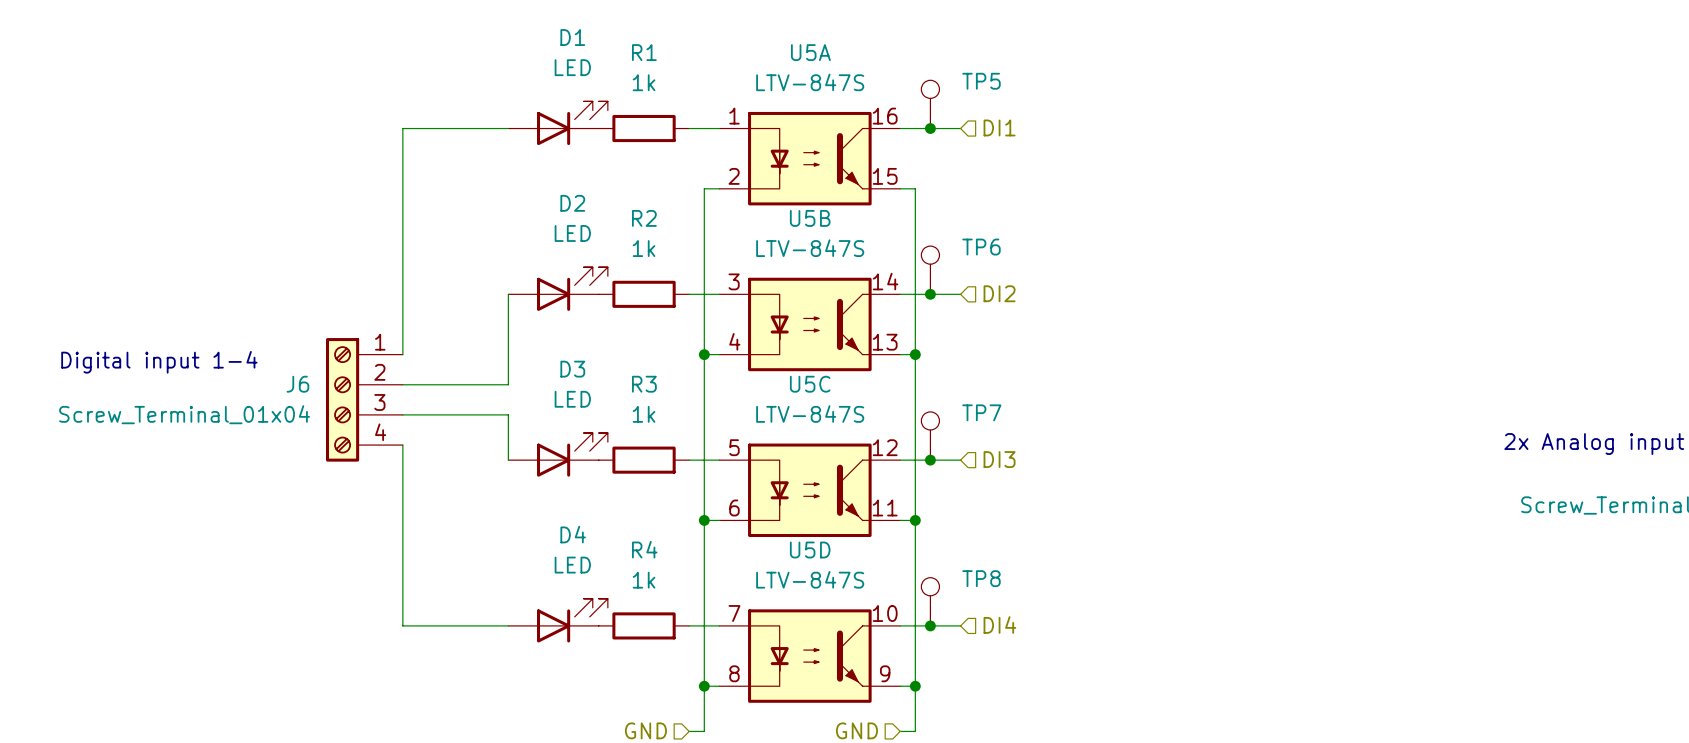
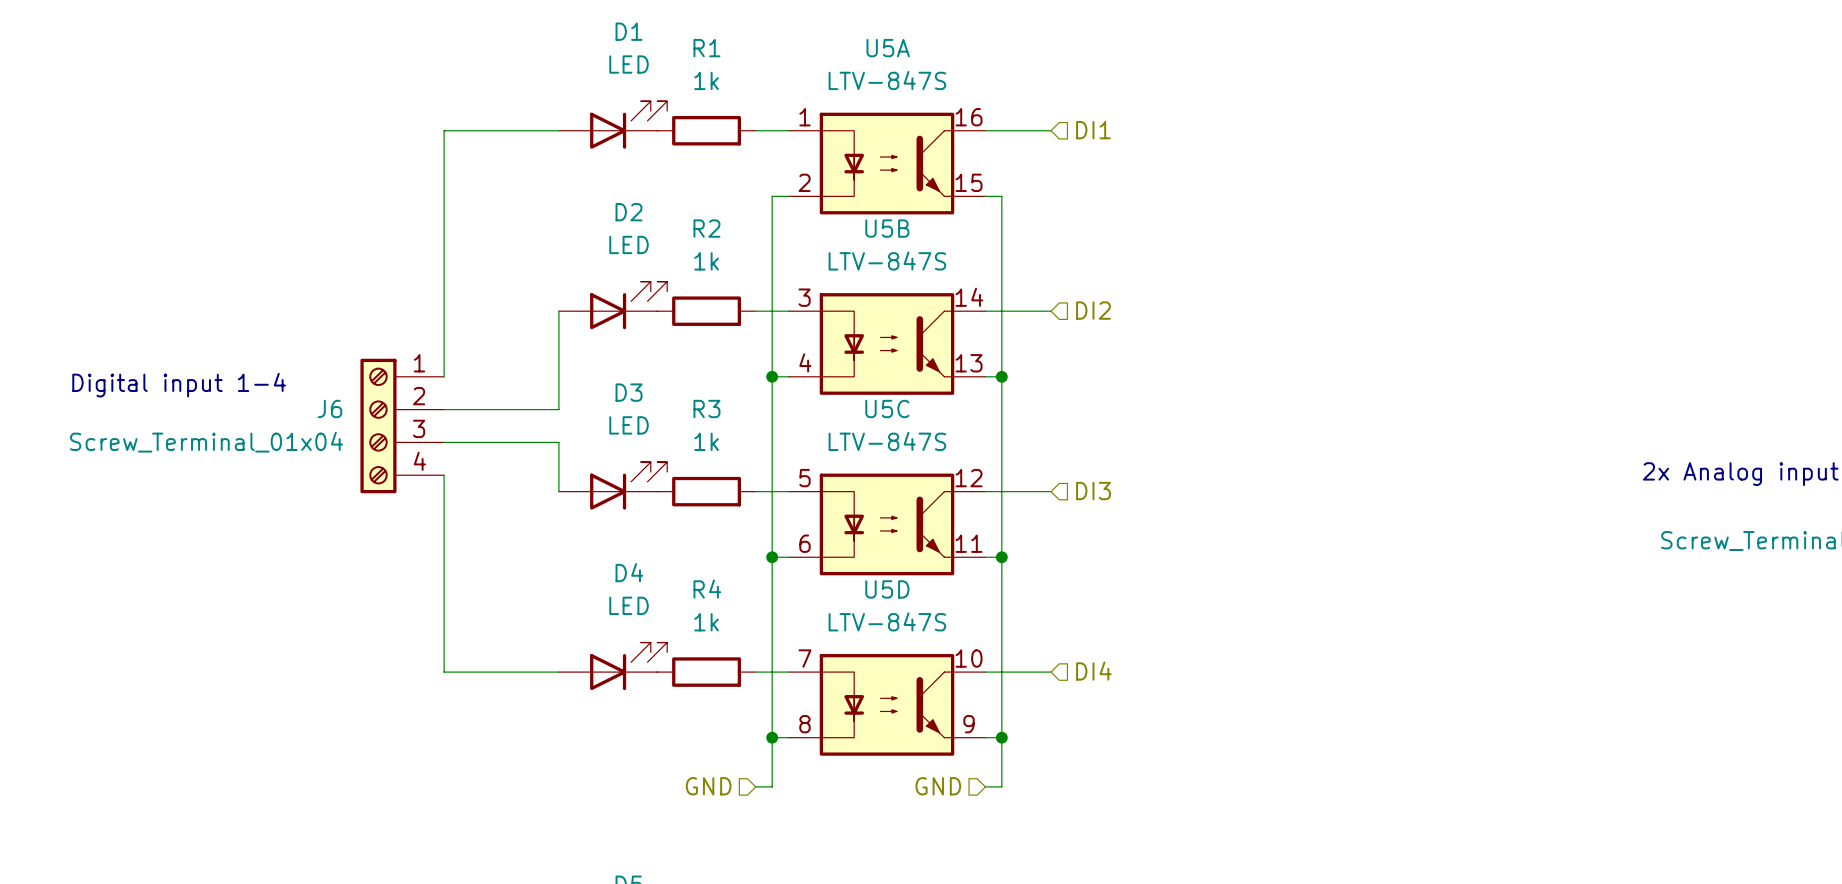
TP5: (930, 104) -> none
junction: (930, 128) -> none
TP6: (930, 270) -> none
junction: (930, 294) -> none
TP7: (930, 436) -> none
junction: (930, 460) -> none
TP8: (930, 601) -> none
junction: (930, 625) -> none

